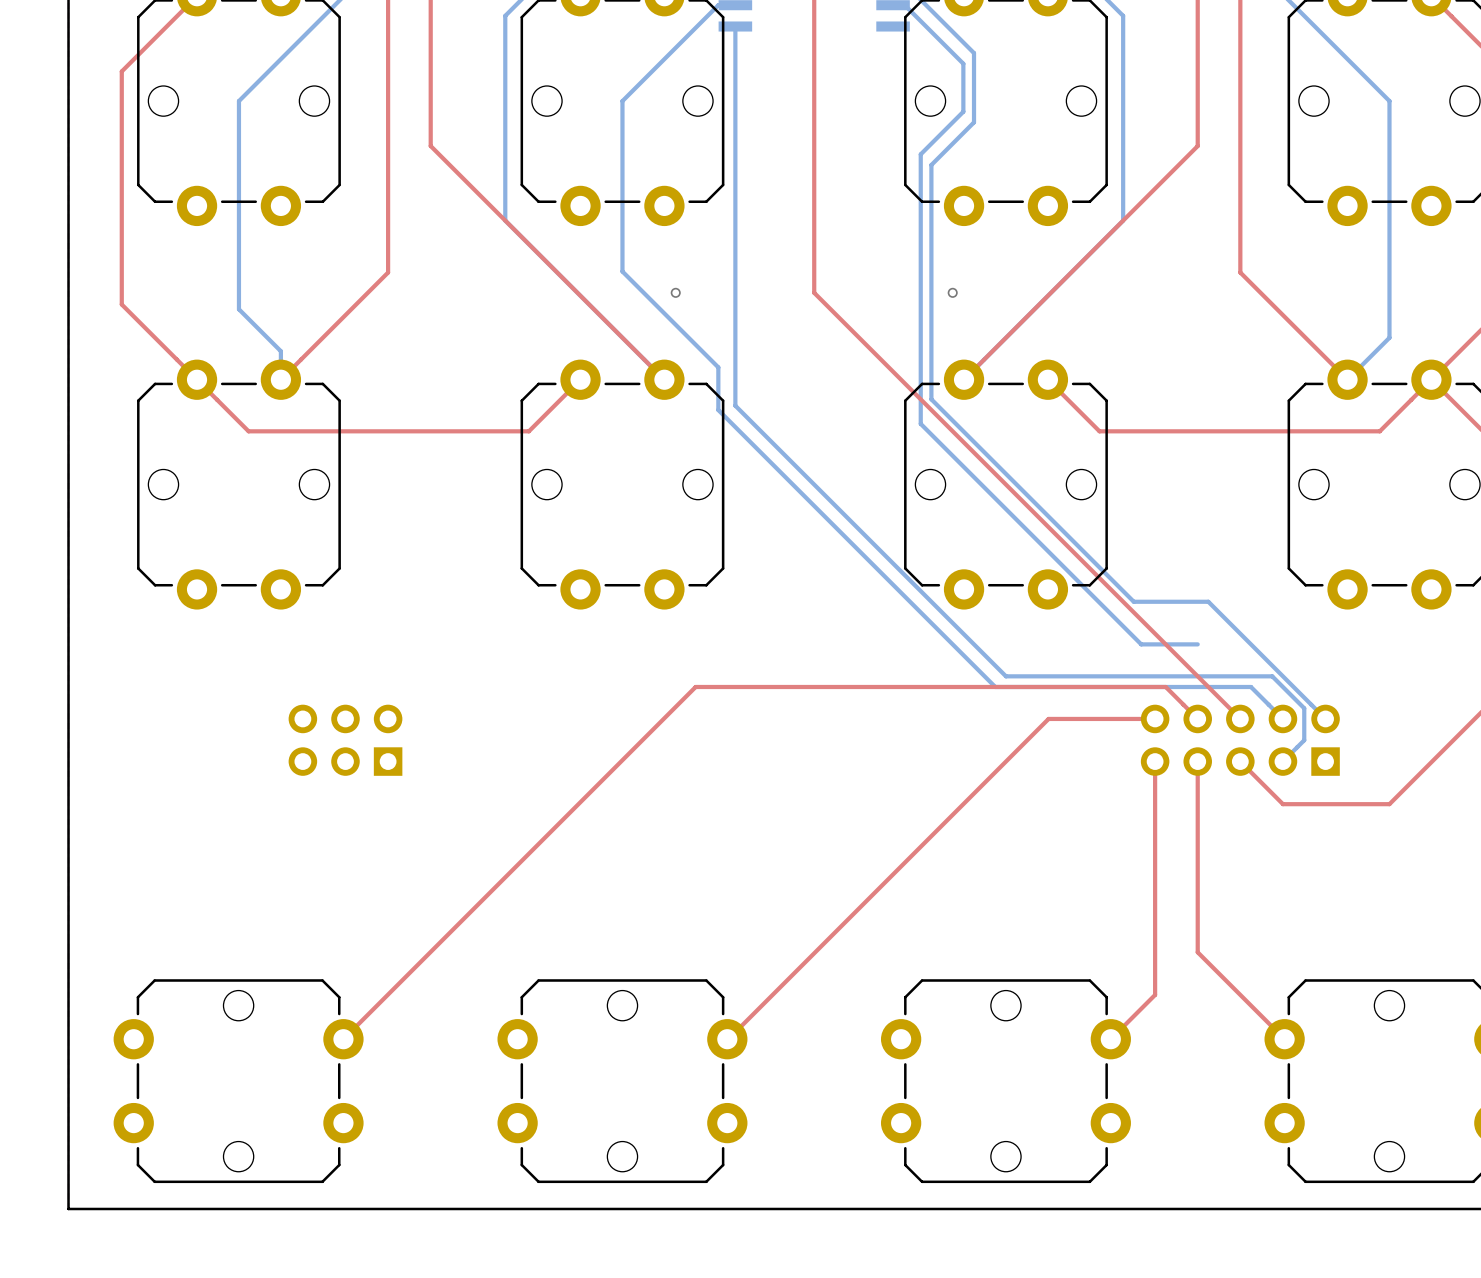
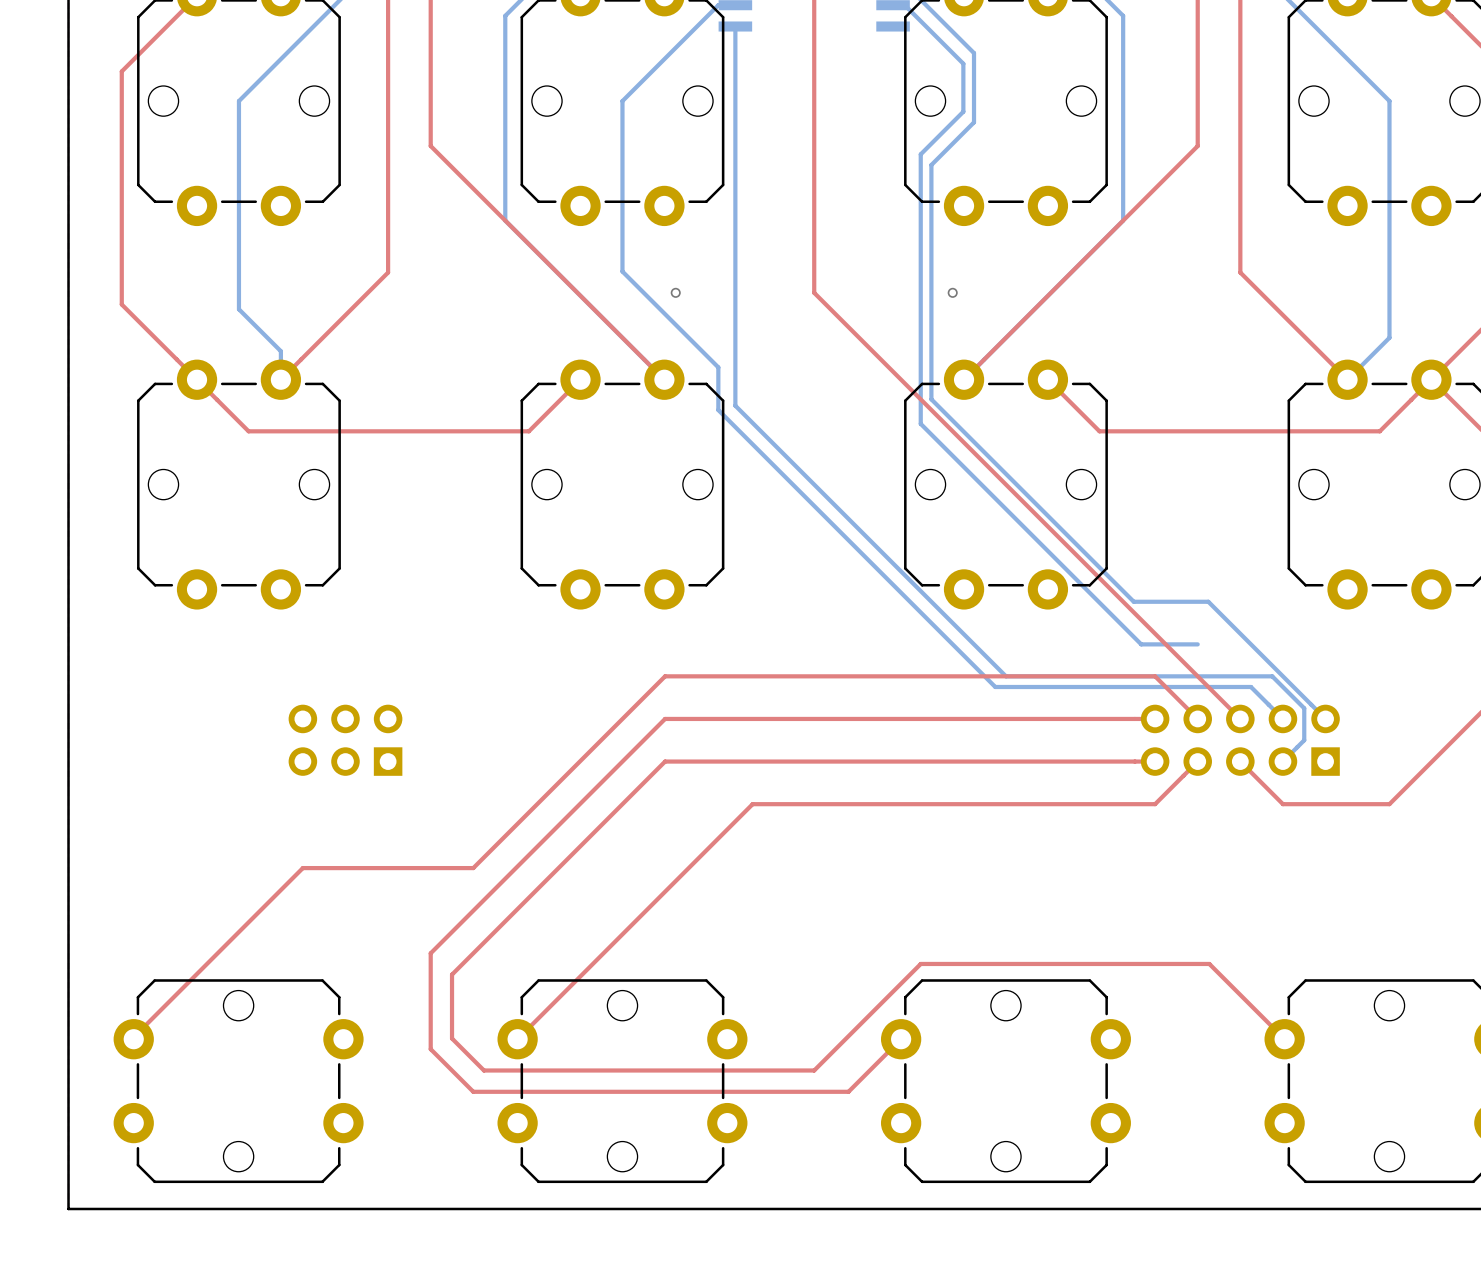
top track: (1165, 686) (695, 686) (343, 1039) -> (1165, 686) (1155, 676) (665, 676) (473, 868) (302, 868) (133, 1039)
top track: (1048, 718) (727, 1039) -> (1048, 718) (665, 718) (430, 953) (430, 1049) (473, 1091) (848, 1091) (901, 1039)
top track: (1155, 761) (1155, 994) (1110, 1039) -> none
top track: (1197, 761) (1197, 952) (1209, 963) -> (1155, 761) (665, 761) (452, 974) (452, 1038) (483, 1070) (814, 1070) (920, 963) (1209, 963)
top track: none -> (1197, 761) (1155, 804) (752, 804) (517, 1039)

